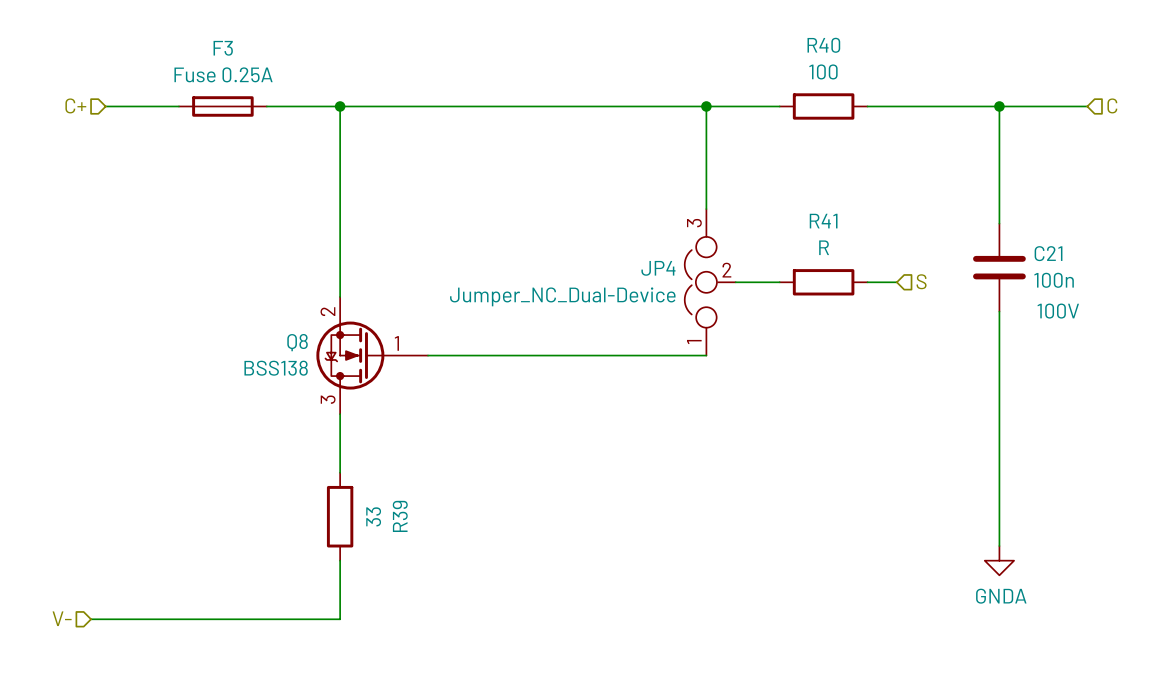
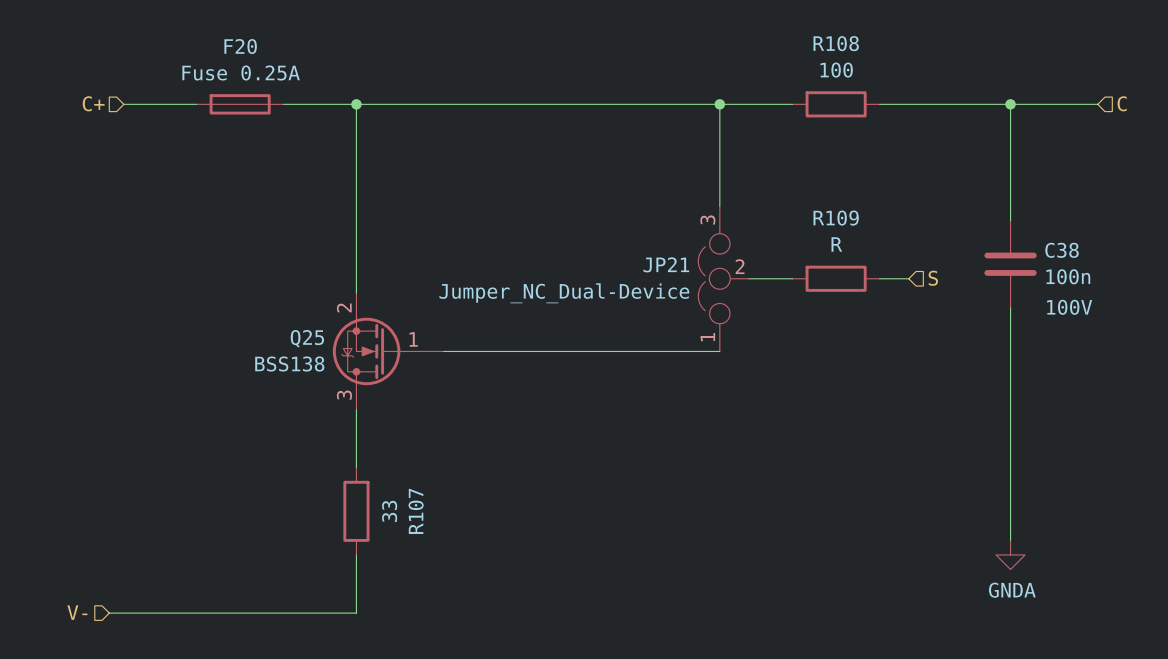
R40 name: R40 (823, 45) -> R108 (836, 43)
F3 name: F3 (223, 48) -> F20 (240, 46)
R41 name: R41 (823, 221) -> R109 (836, 218)
C21 name: C21 (1048, 253) -> C38 (1062, 250)
JP4 name: JP4 (658, 268) -> JP21 (666, 264)
Q8 name: Q8 (297, 342) -> Q25 (307, 338)
R39 name: R39 (400, 516) -> R107 (416, 511)

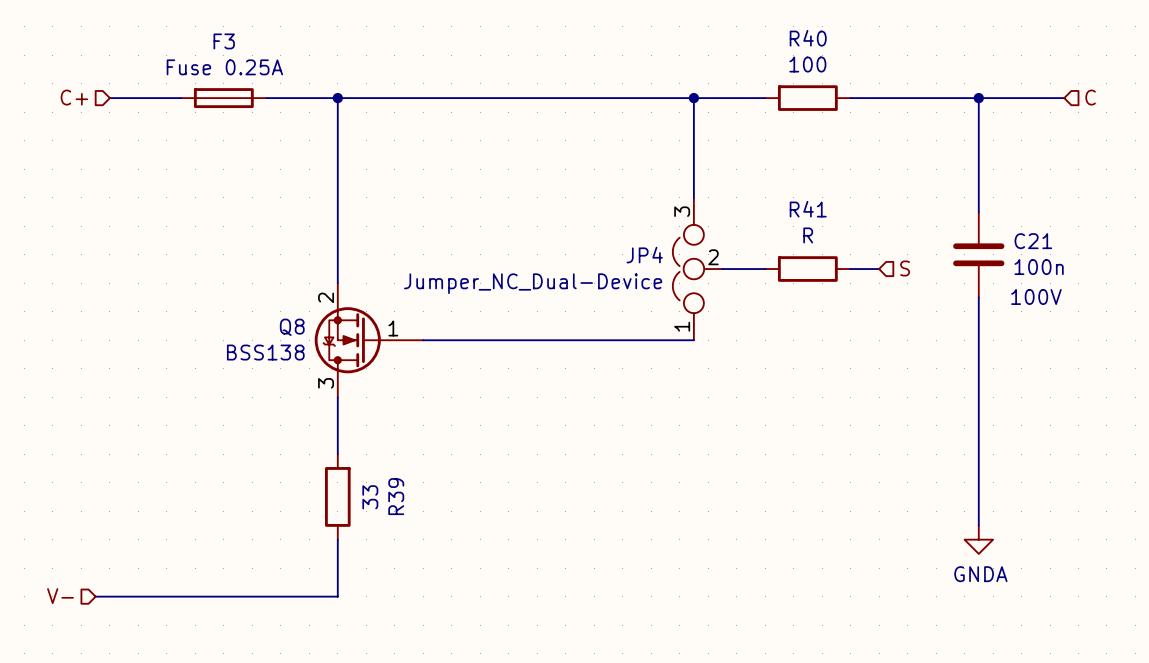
R108 name: R108 (836, 43) -> R40 (808, 38)
F20 name: F20 (240, 46) -> F3 (224, 41)
R109 name: R109 (836, 218) -> R41 (808, 209)
C38 name: C38 (1062, 250) -> C21 (1033, 241)
JP21 name: JP21 (666, 264) -> JP4 (644, 255)
Q25 name: Q25 (307, 338) -> Q8 (292, 327)
R107 name: R107 (416, 511) -> R39 (396, 496)

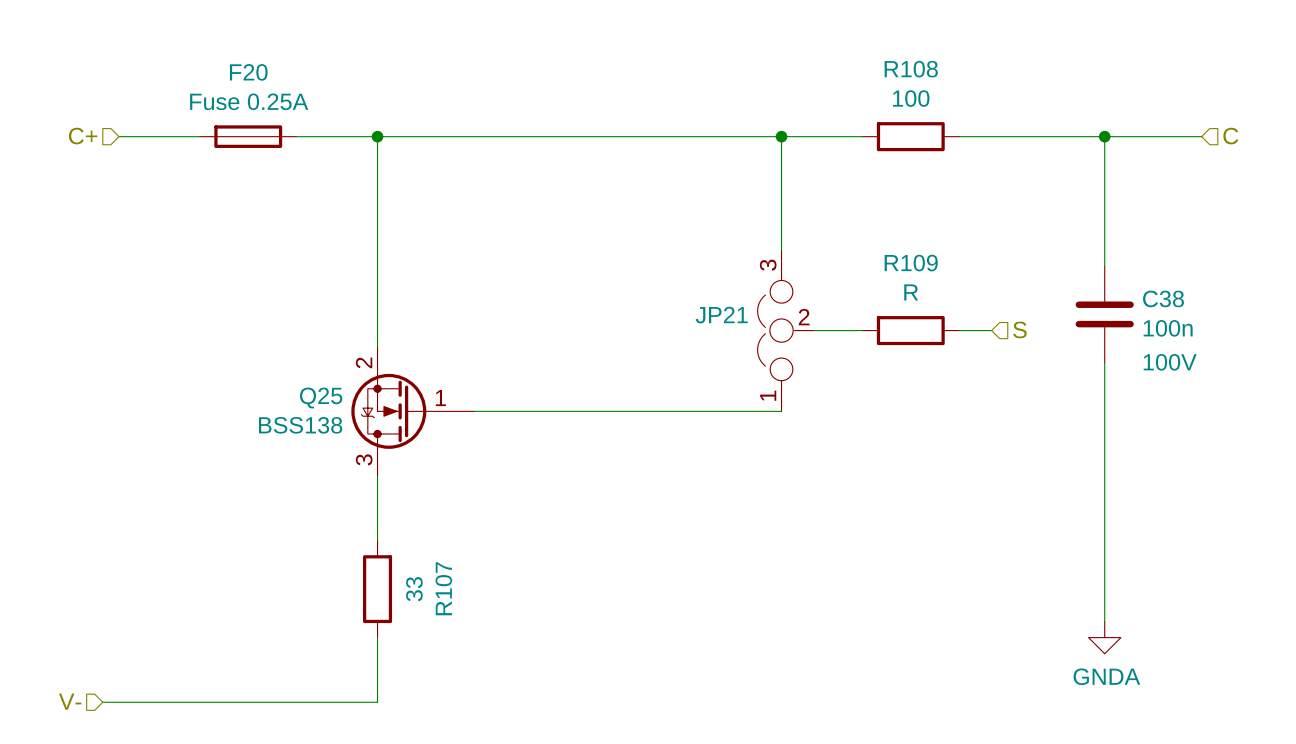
R40 name: R40 (808, 38) -> R108 (911, 69)
F3 name: F3 (224, 41) -> F20 (248, 72)
R41 name: R41 (808, 209) -> R109 (911, 263)
C21 name: C21 (1033, 241) -> C38 (1163, 298)
JP4 name: JP4 (644, 255) -> JP21 (721, 315)
JP4 value: Jumper_NC_Dual-Device (533, 283) -> none
Q8 name: Q8 (292, 327) -> Q25 (321, 398)
R39 name: R39 (396, 496) -> R107 (443, 588)

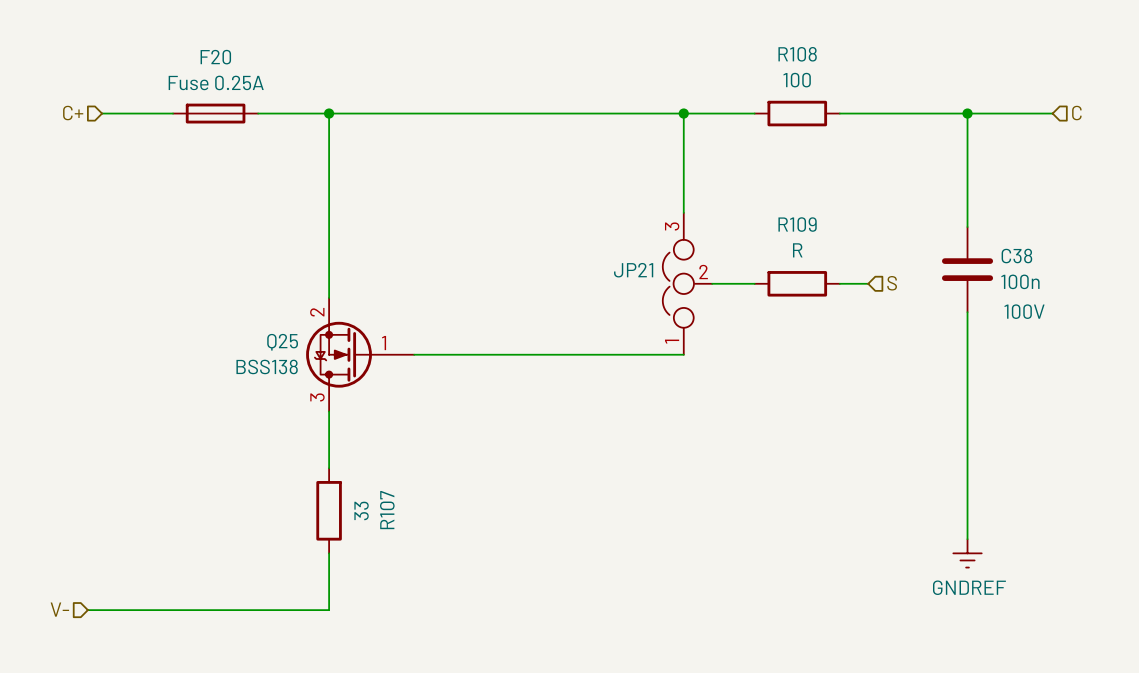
power symbol: GNDA (1104, 637) -> GNDREF (967, 553)

